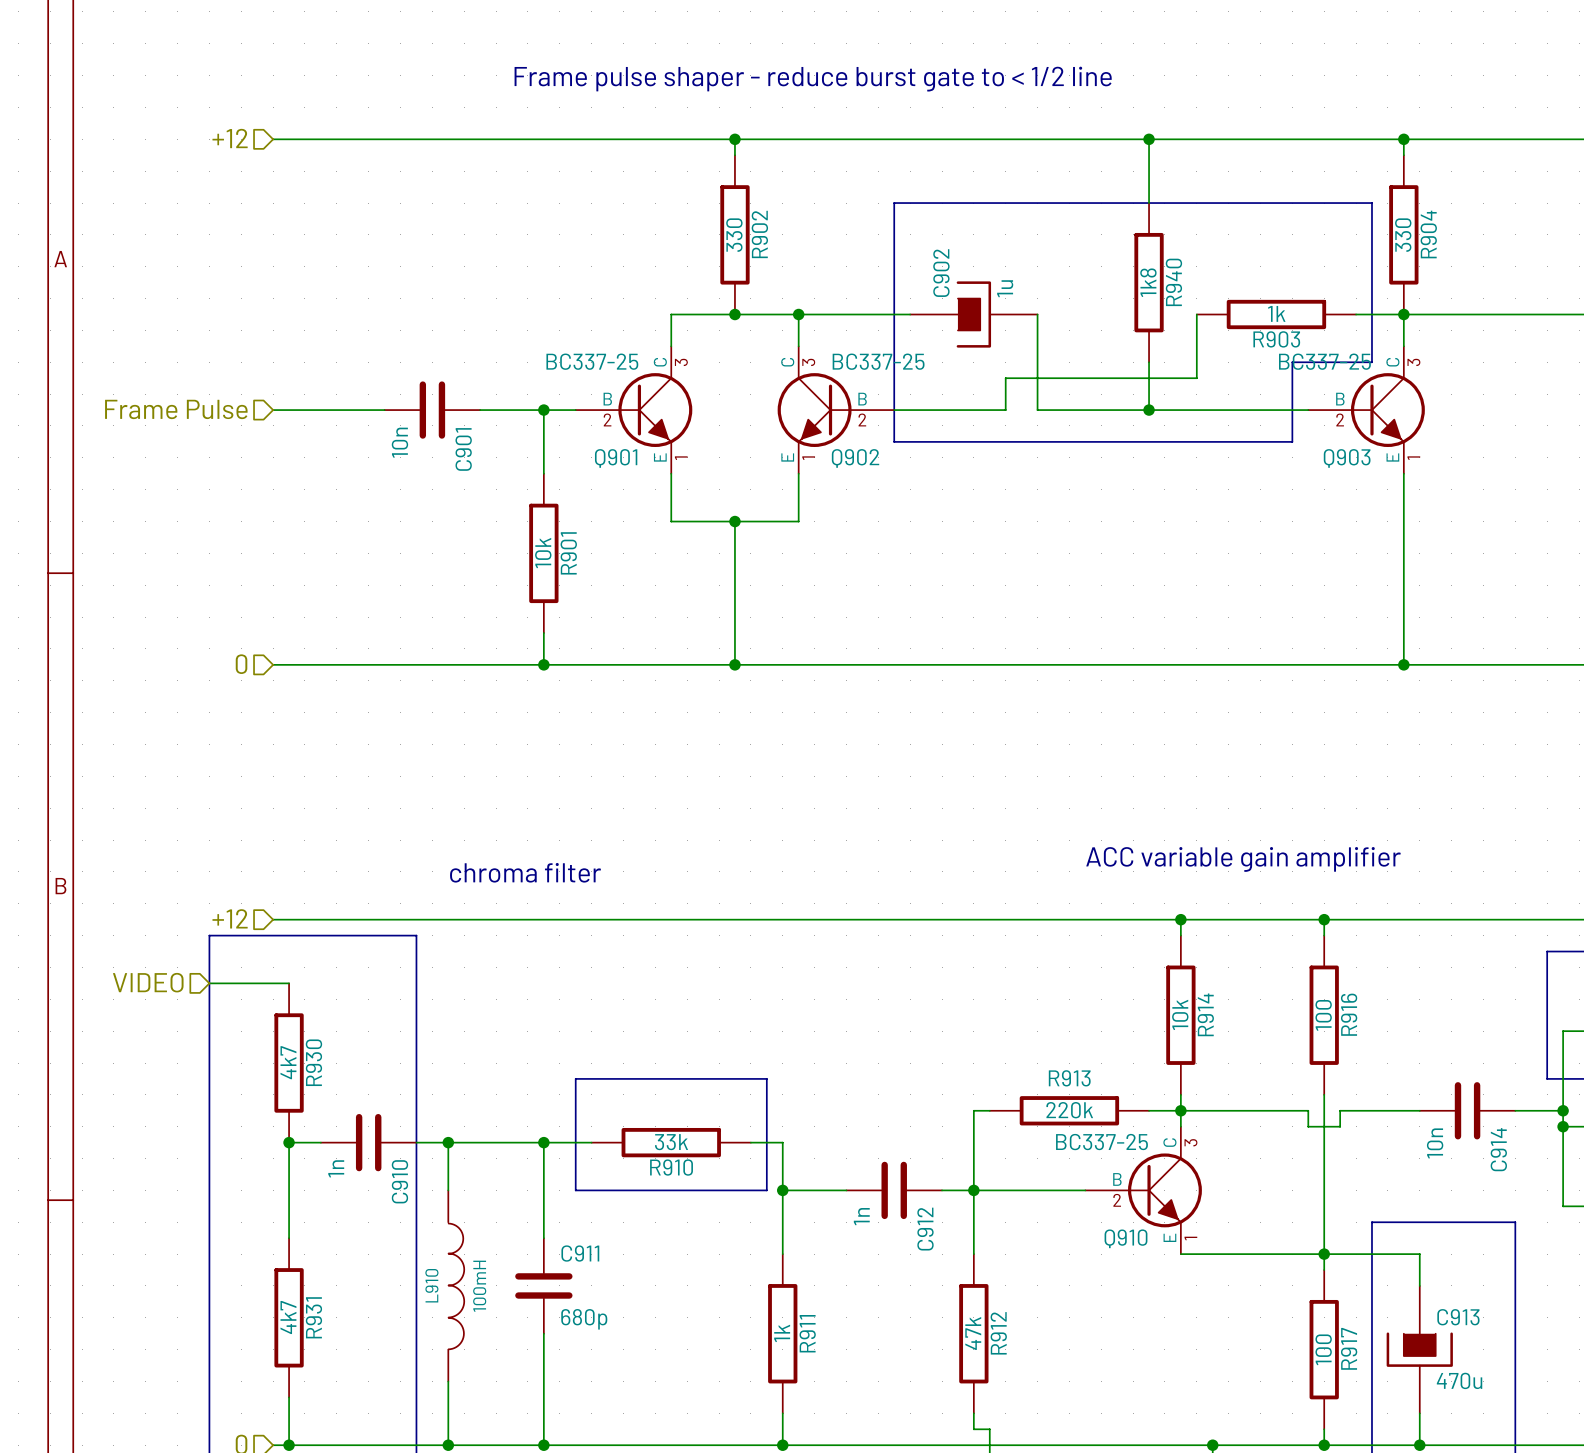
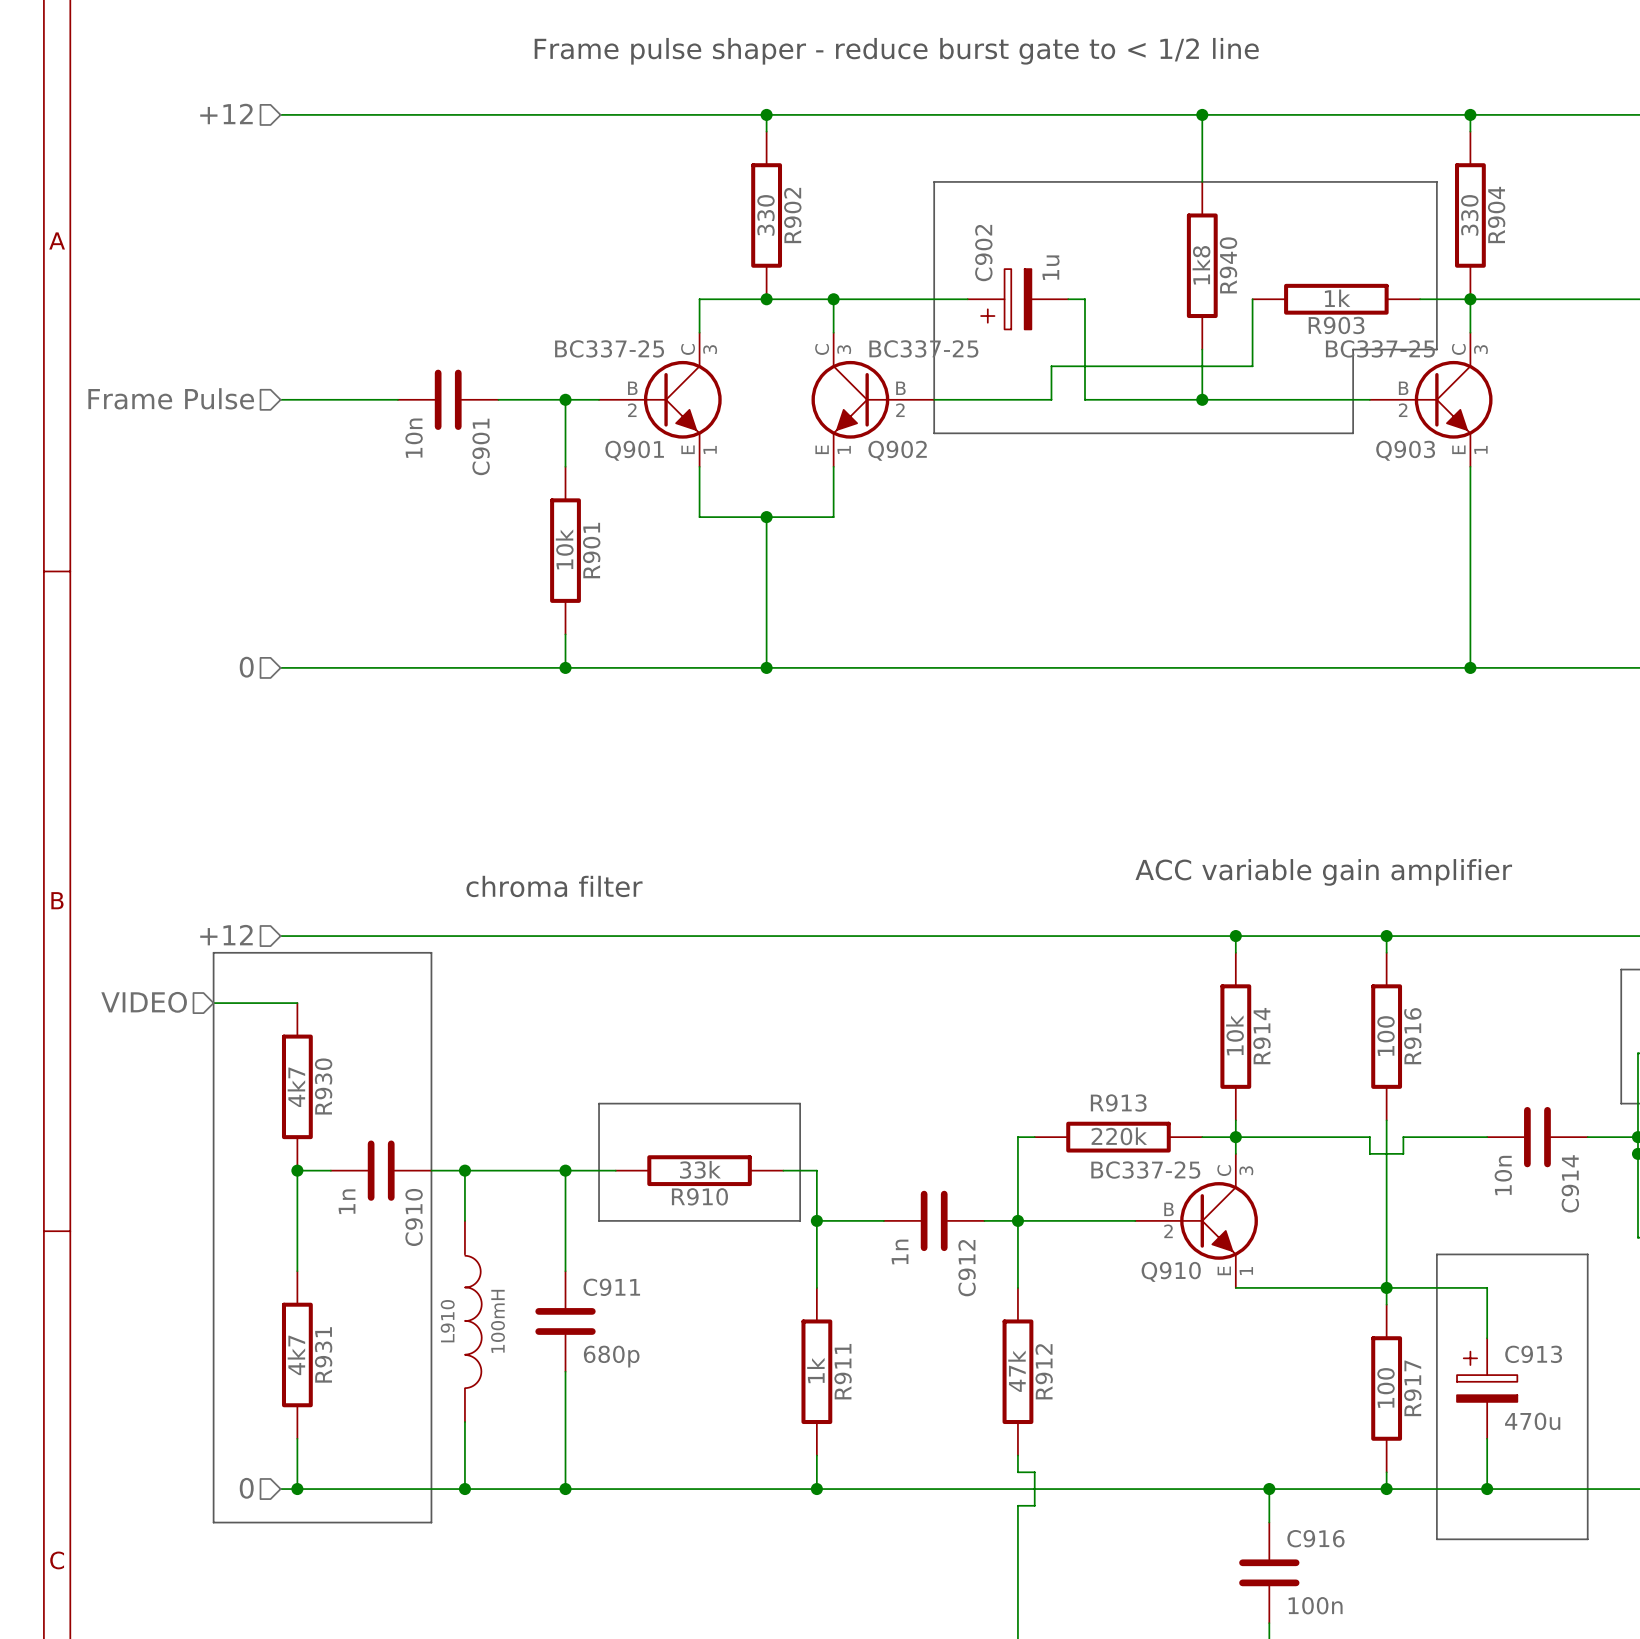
C902 symbol: [910, 281, 1038, 348] -> [967, 269, 1069, 330]
C913 symbol: [1386, 1285, 1453, 1414] -> [1457, 1338, 1518, 1439]

